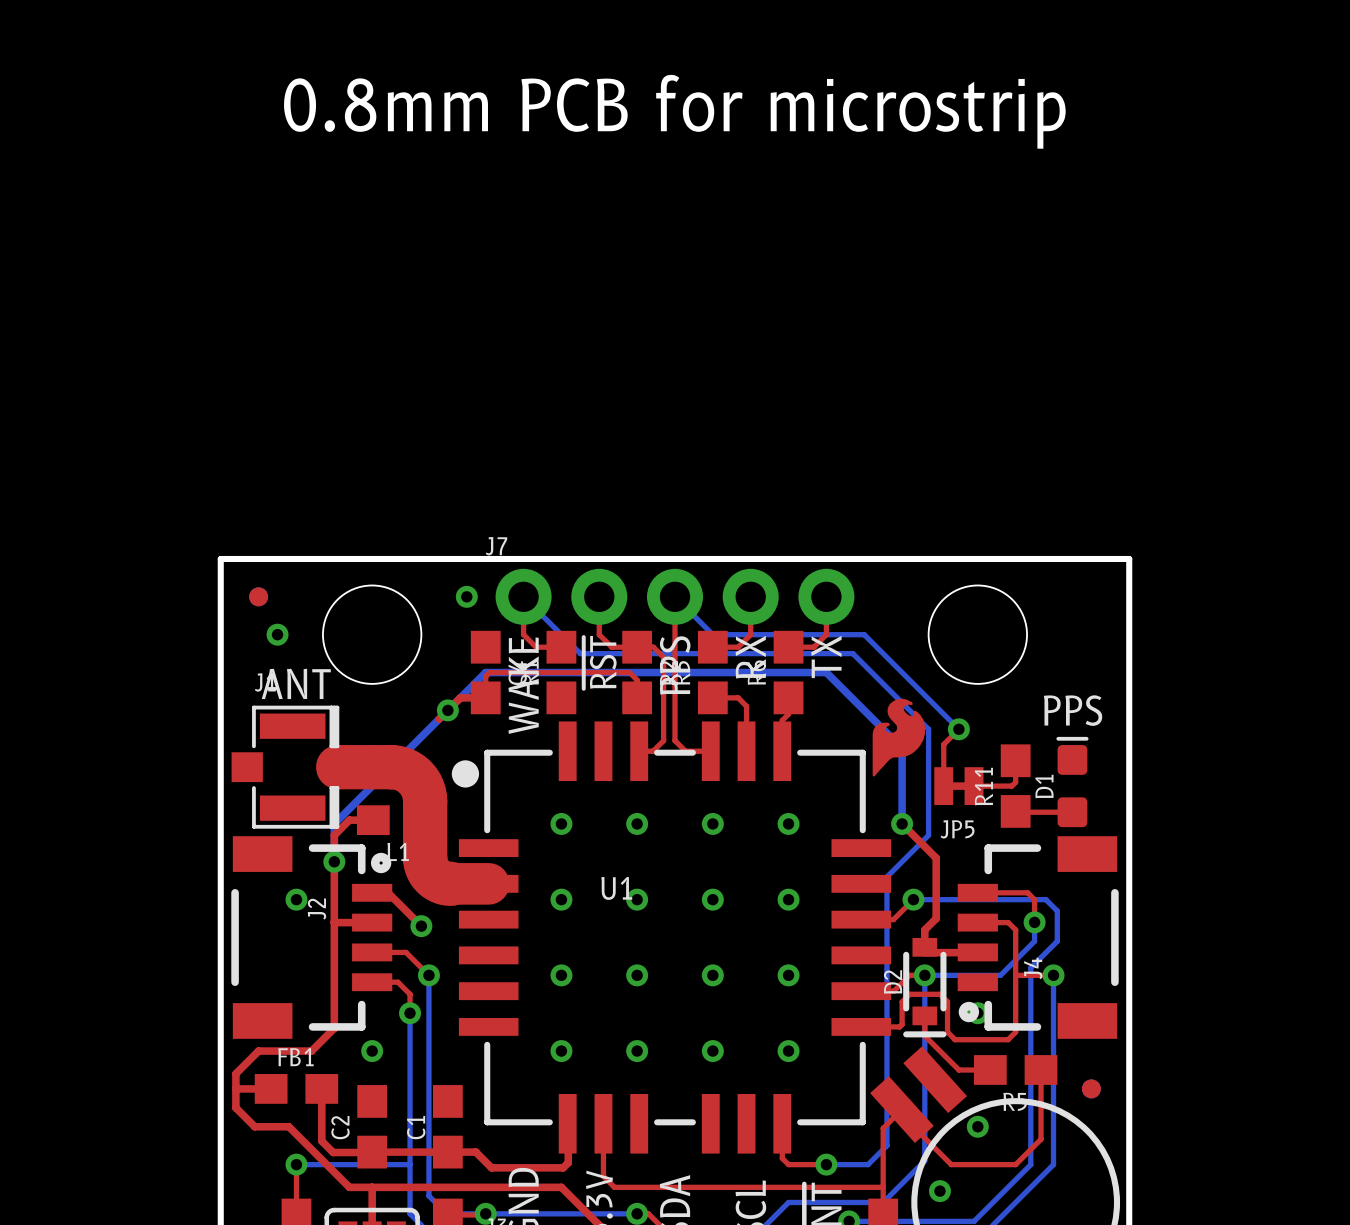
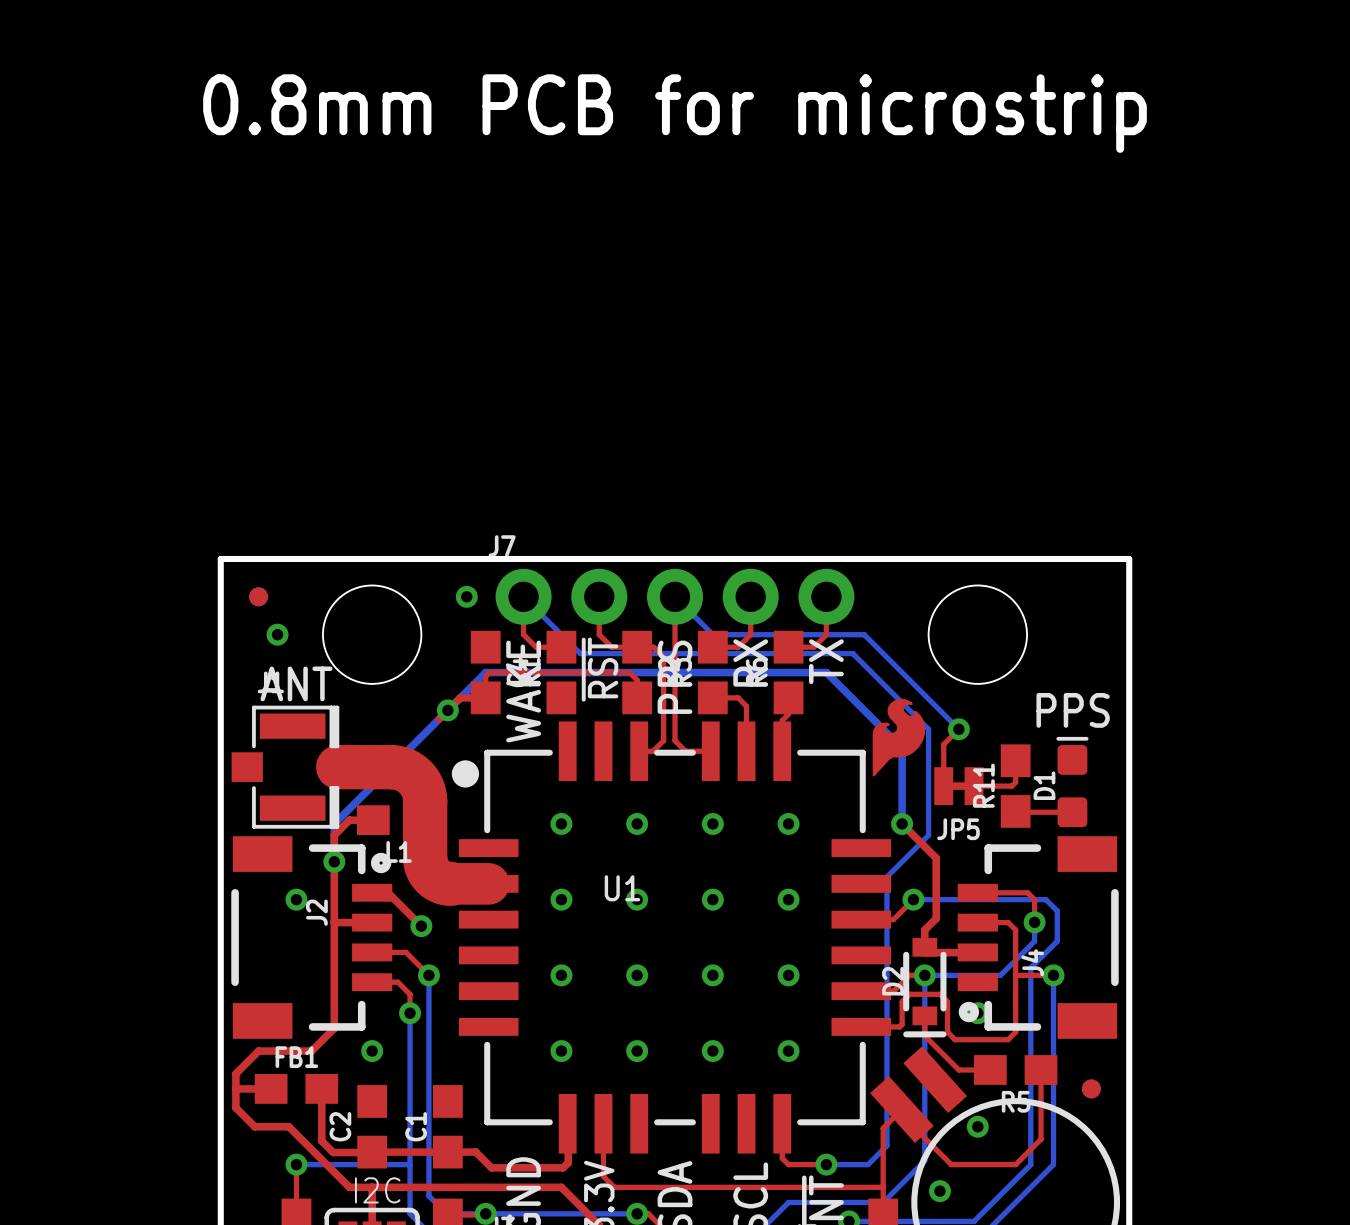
text: none -> I2C (377, 1190)

